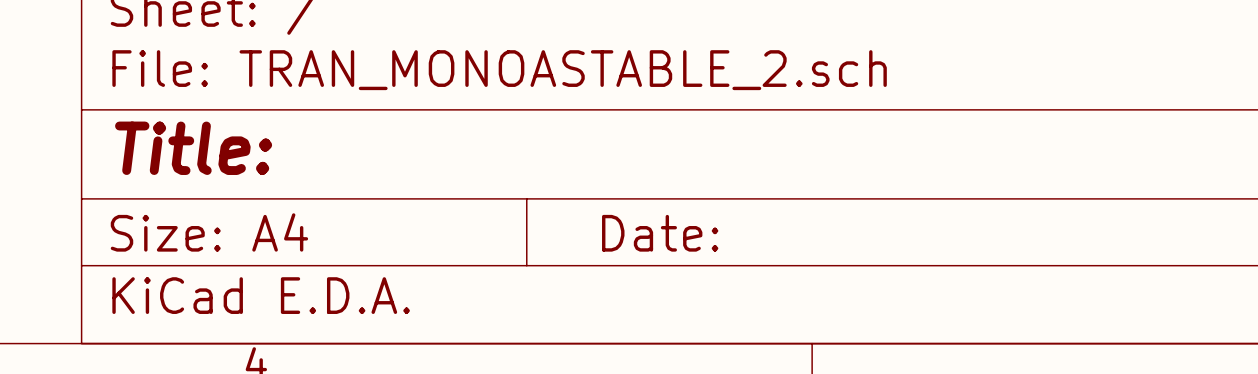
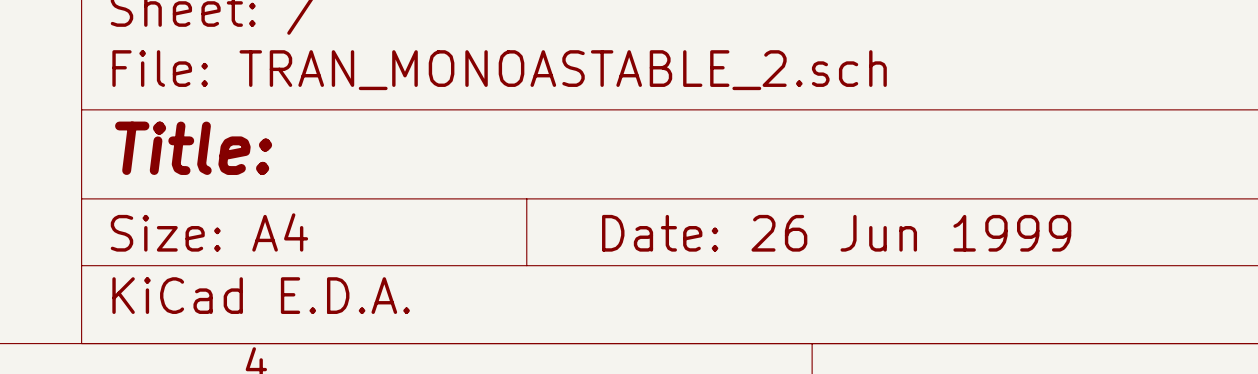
title block: Date: (660, 233) -> Date: 26 Jun 1999 (836, 233)

